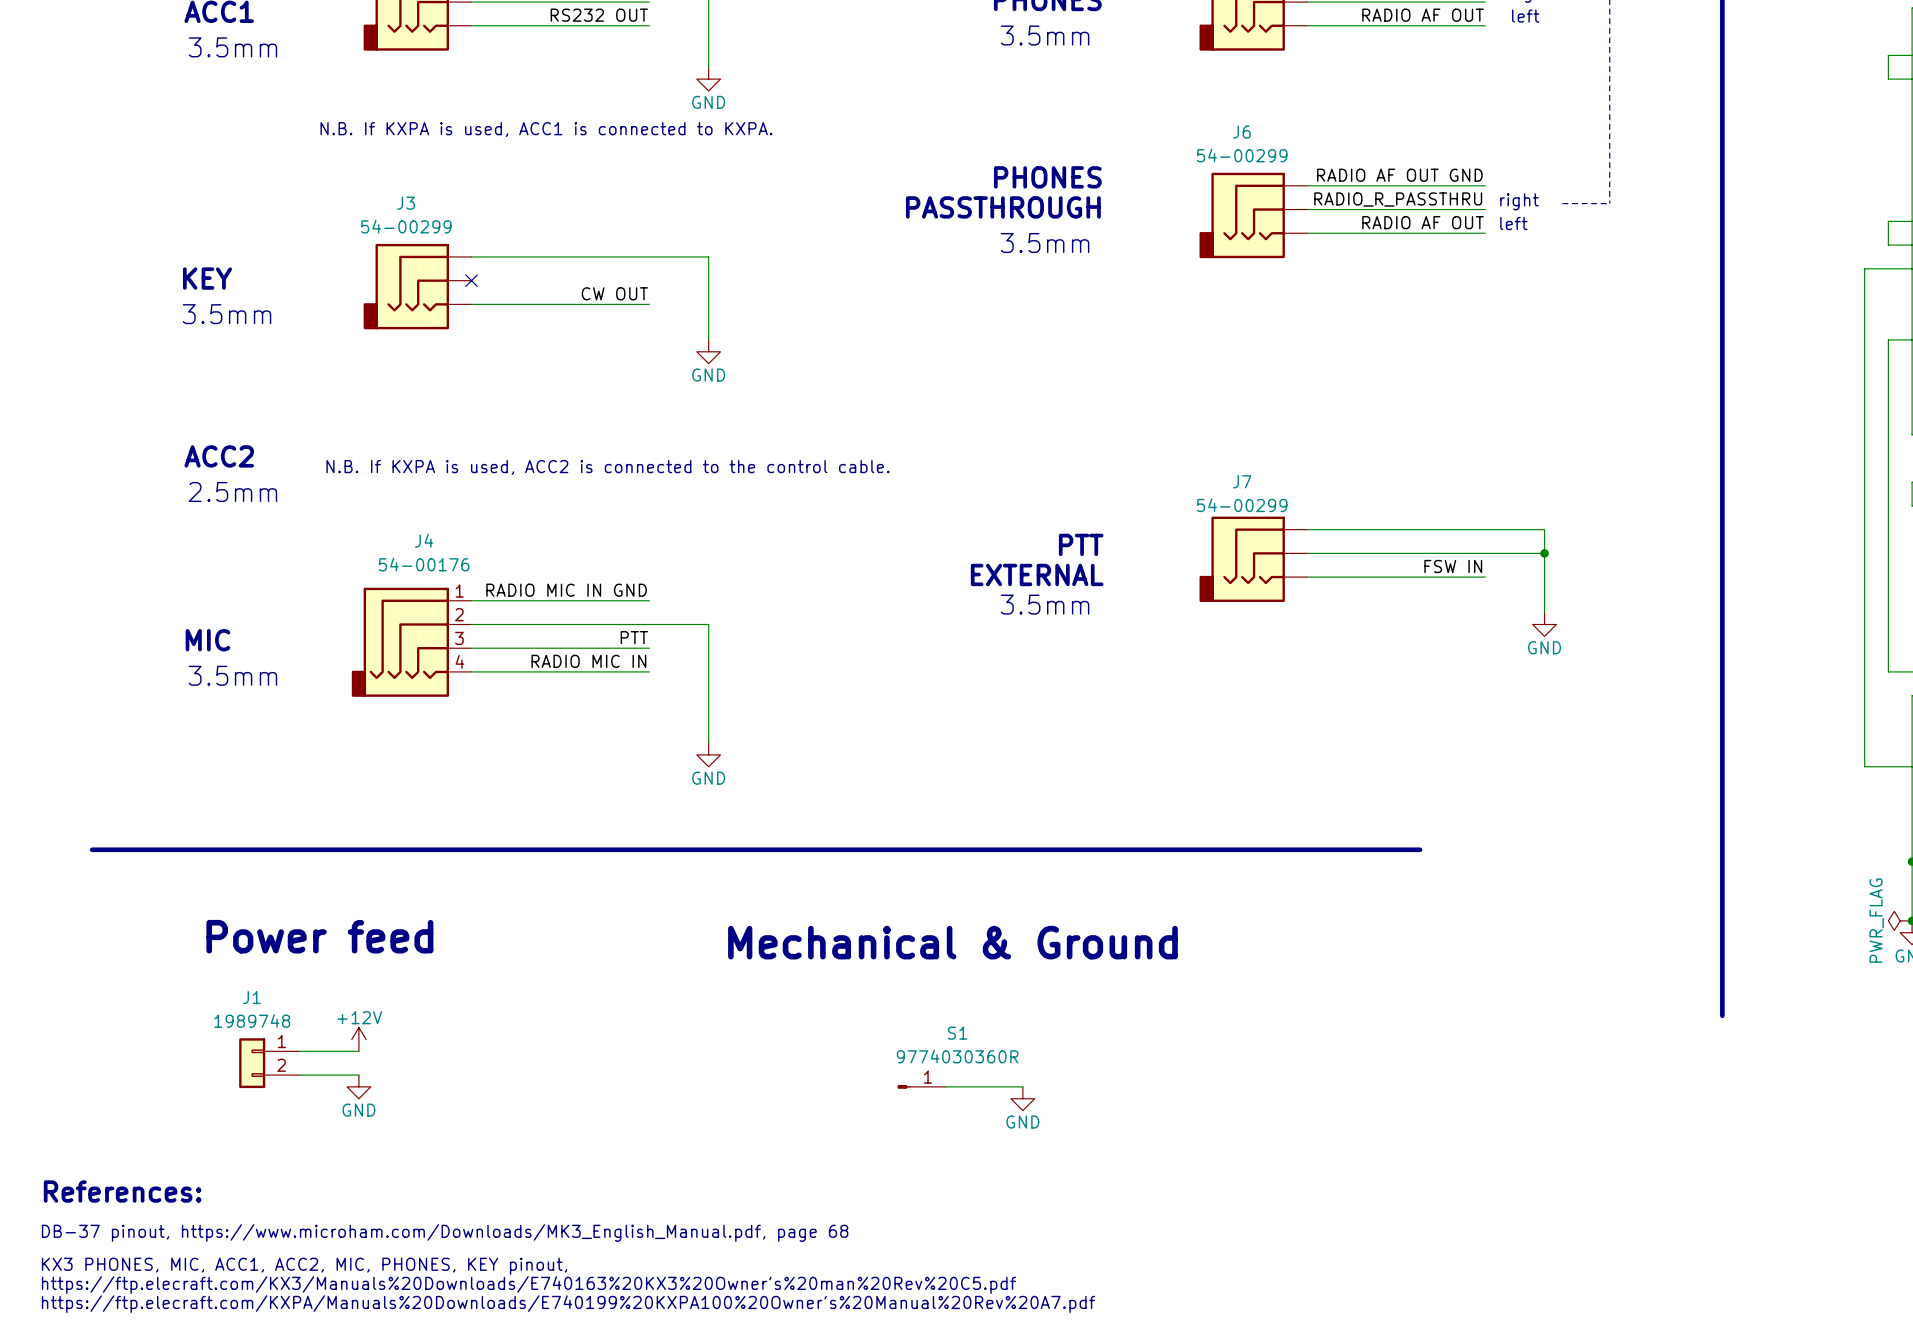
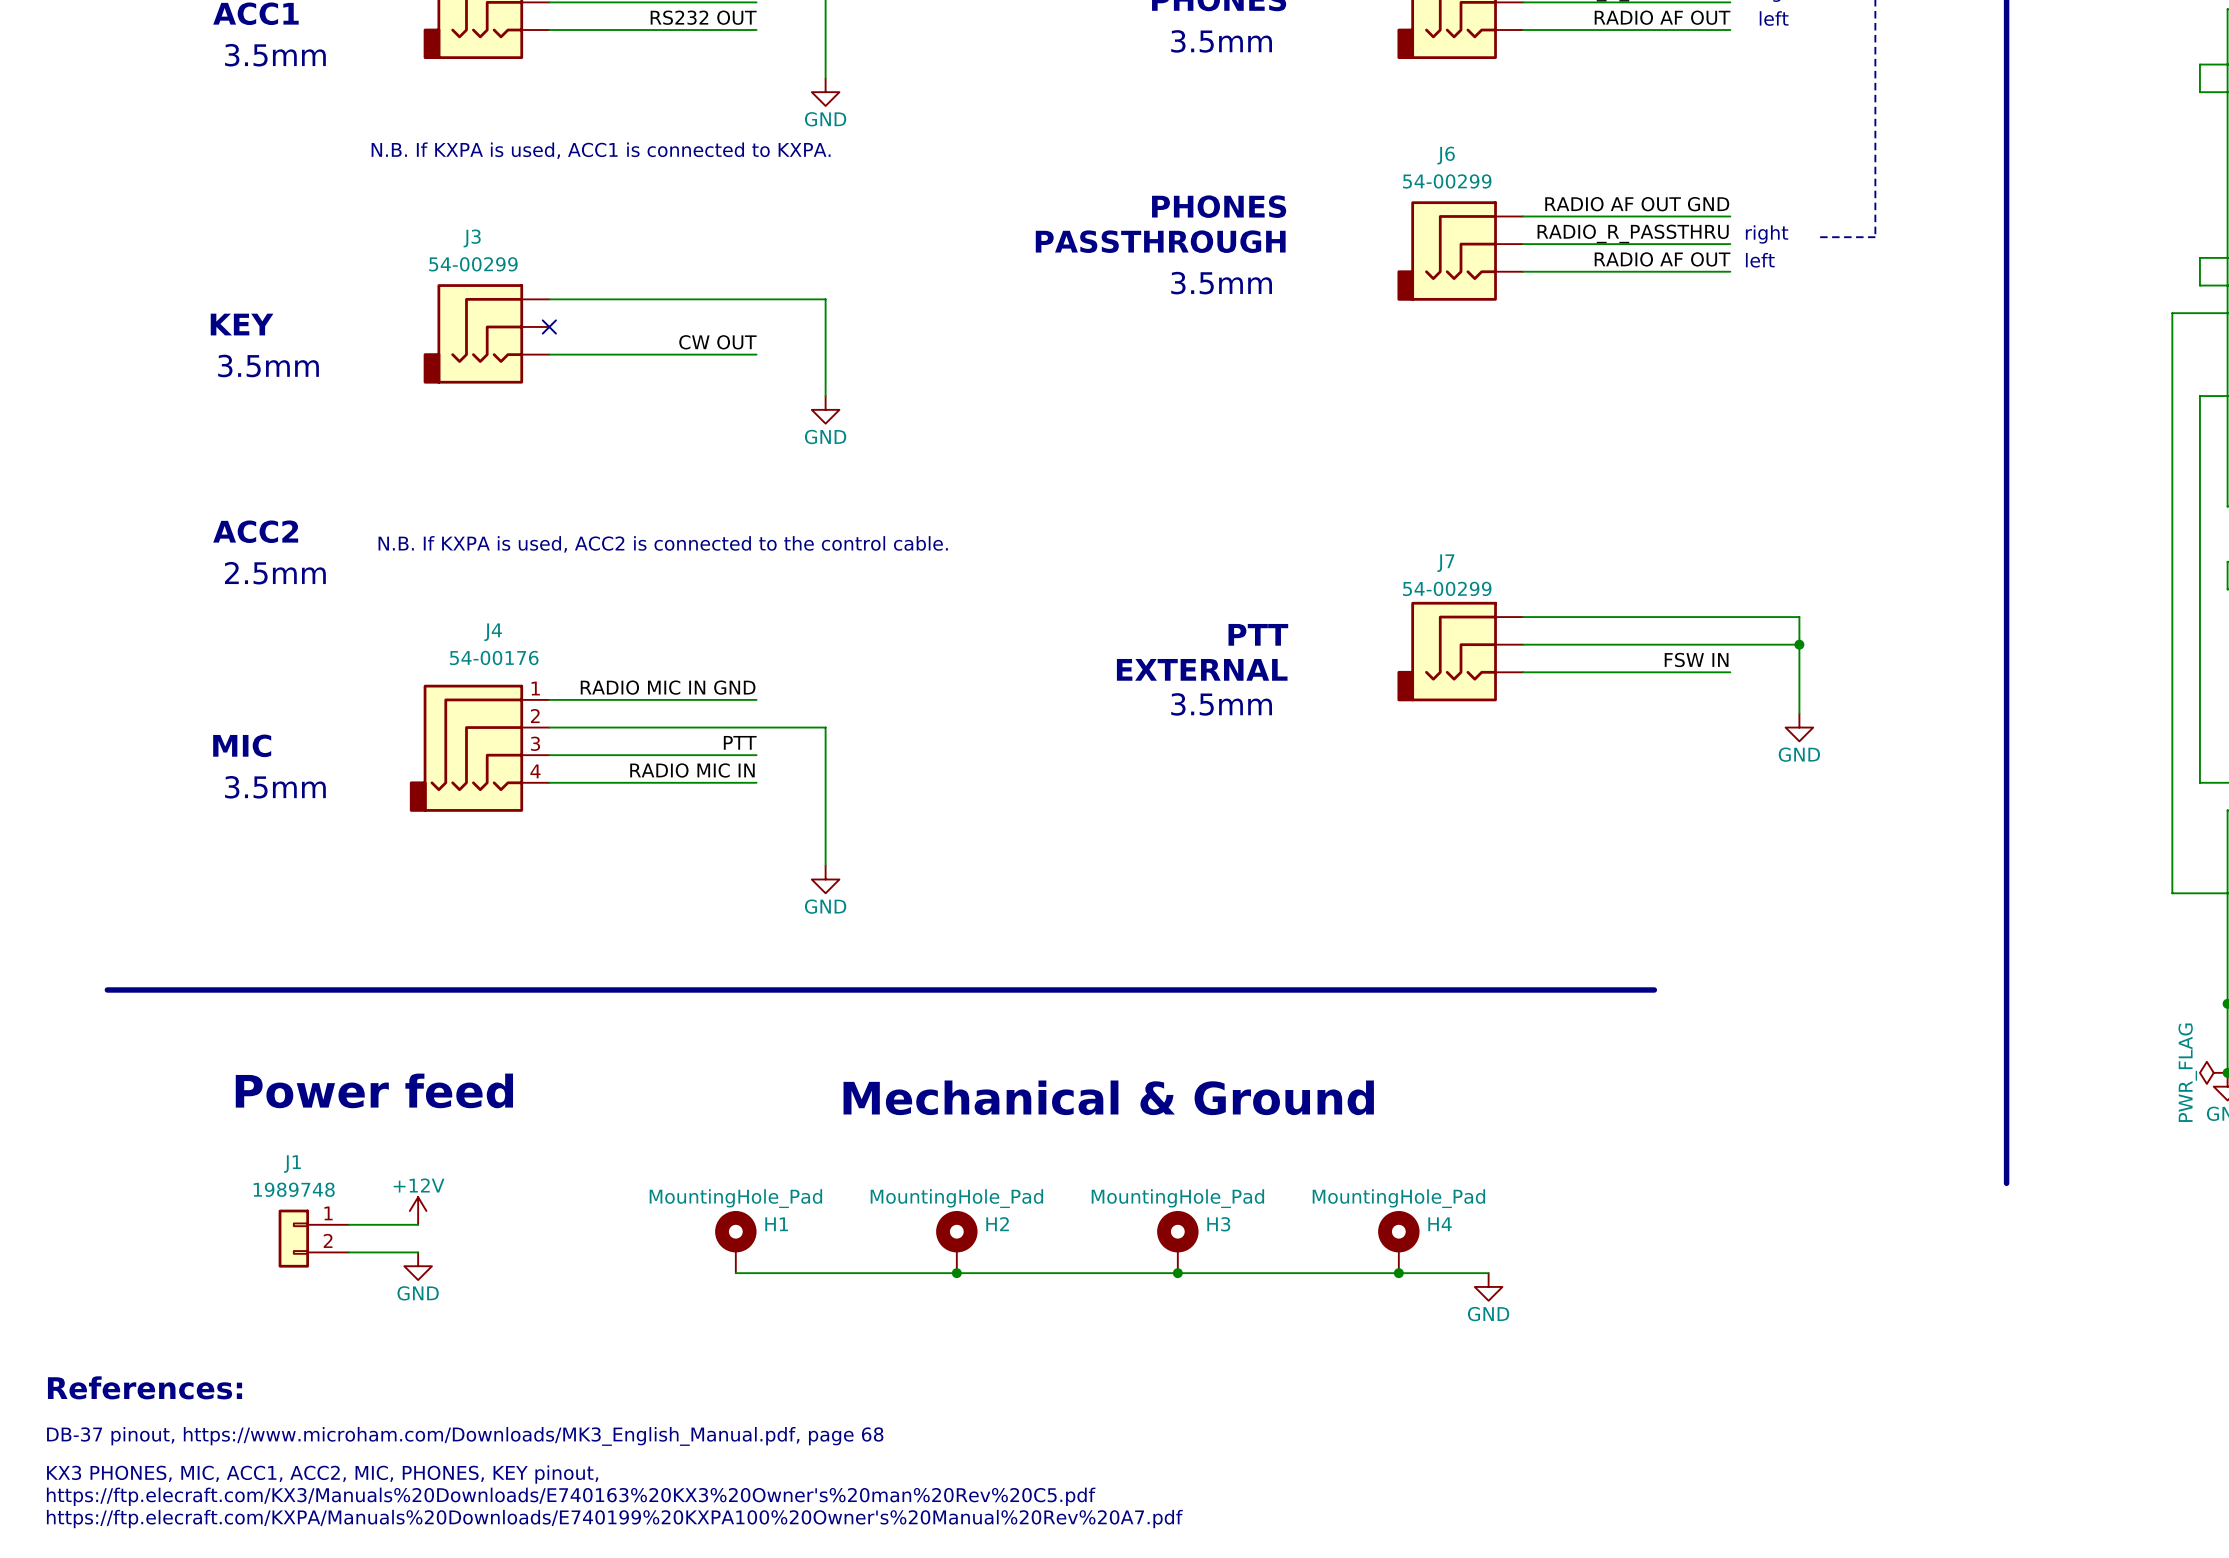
H1: none -> MountingHole_Pad (735, 1242)
H2: none -> MountingHole_Pad (956, 1242)
H3: none -> MountingHole_Pad (1177, 1242)
H4: none -> MountingHole_Pad (1398, 1242)
S1: 9774030360R (921, 1086) -> none
wire: (945, 1086) (1022, 1086) -> none
wire: none -> (735, 1273) (1488, 1273)
junction: none -> (956, 1273)
junction: none -> (1177, 1273)
junction: none -> (1398, 1273)
power symbol: GND (1022, 1098) -> none
power symbol: none -> GND (1488, 1286)

